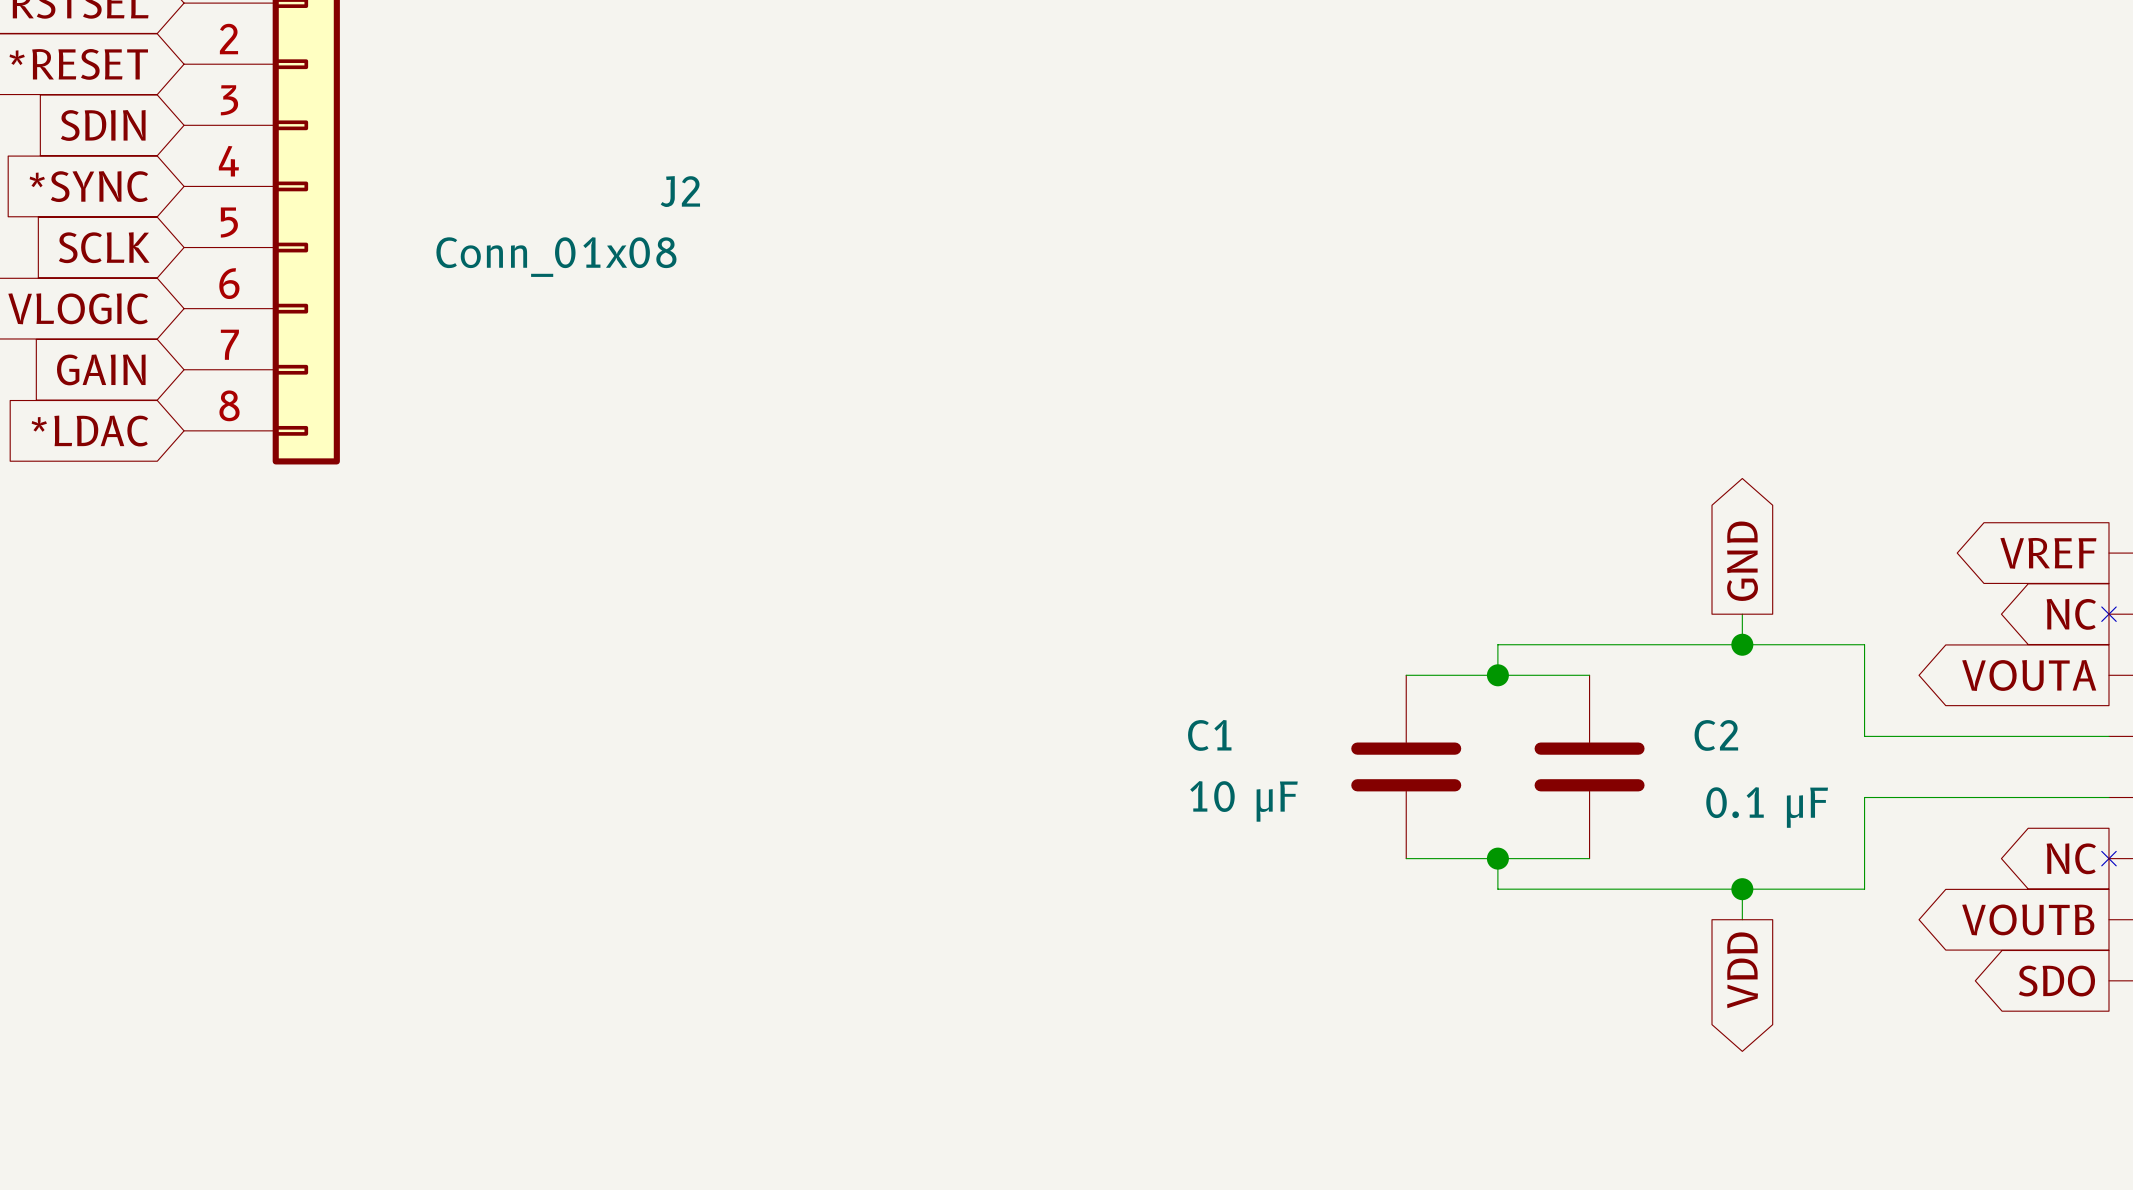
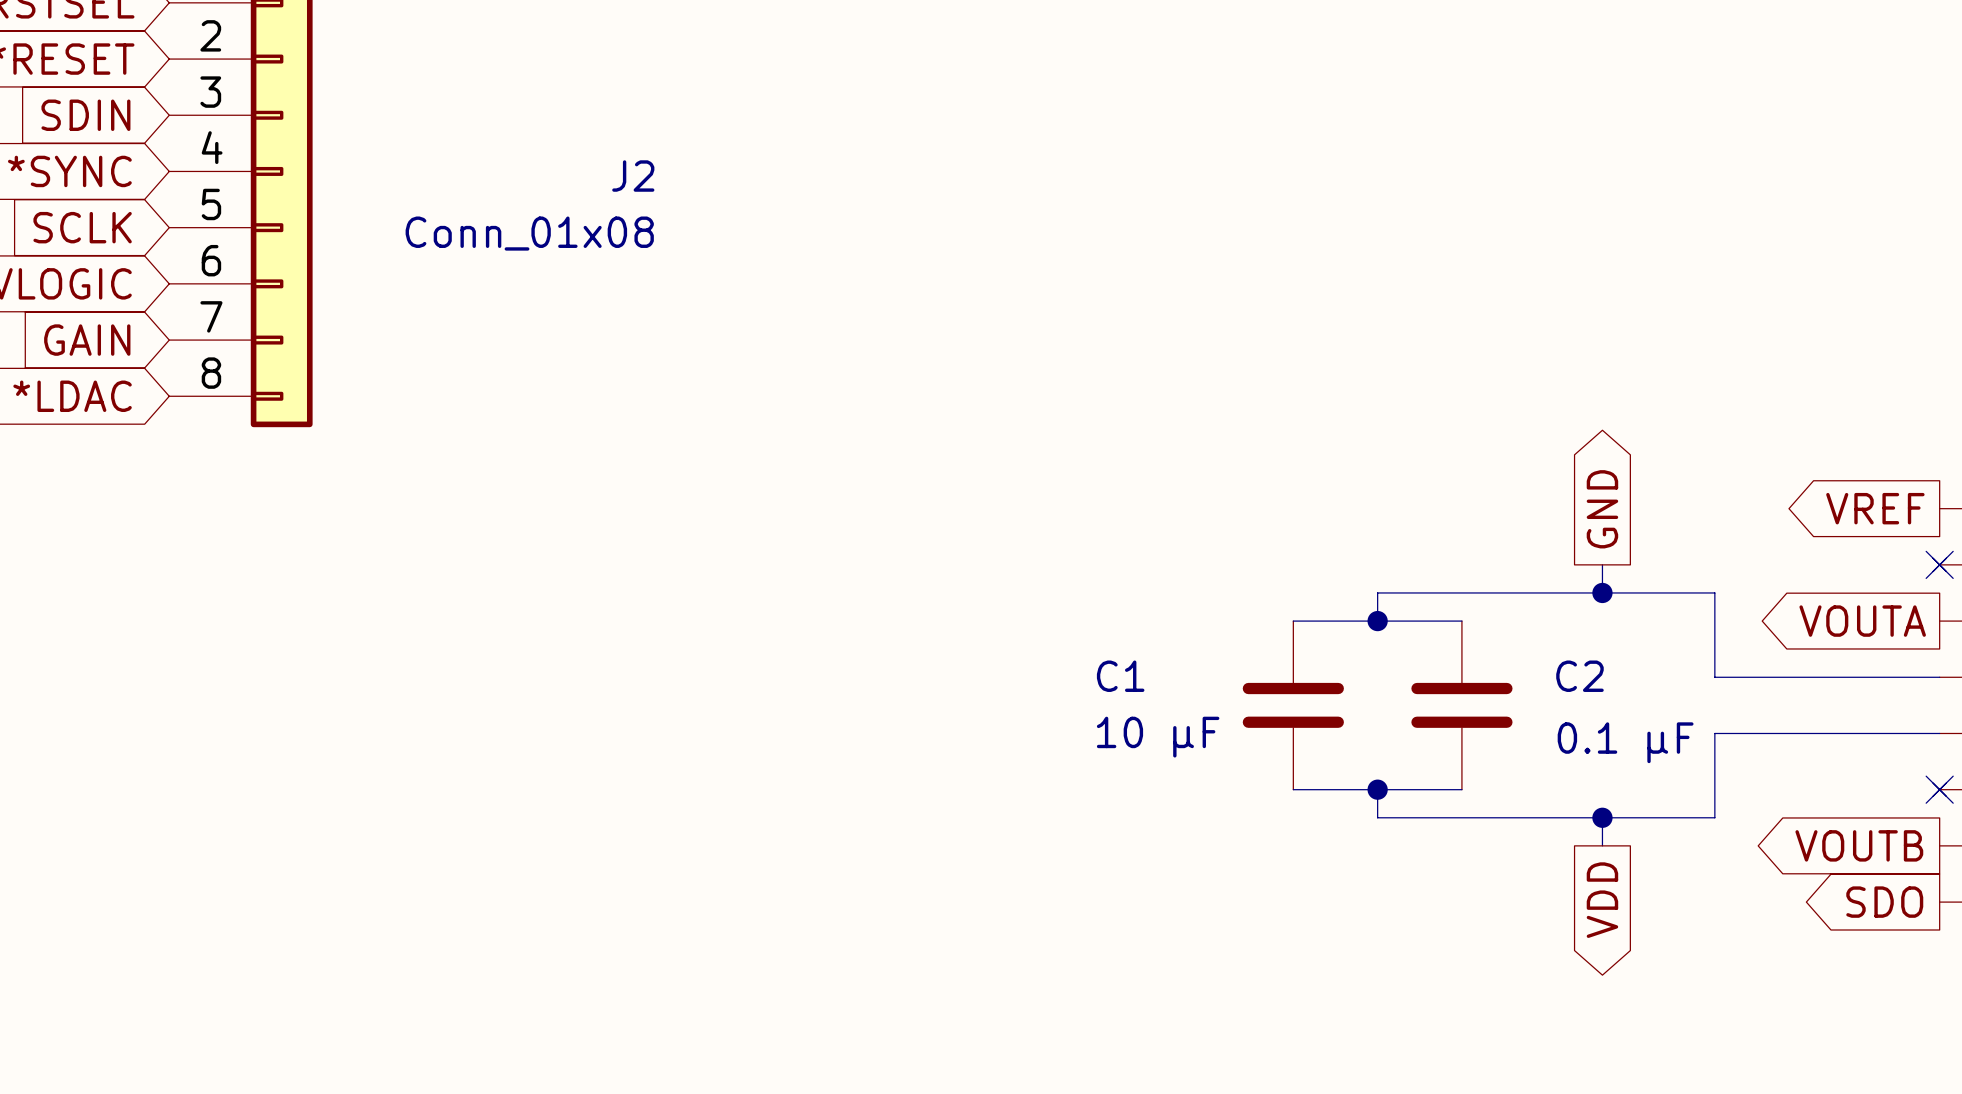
global label: NC (2071, 614) -> none
no-connect mark: none -> (1939, 564)
global label: NC (2071, 858) -> none
no-connect mark: none -> (1939, 789)

